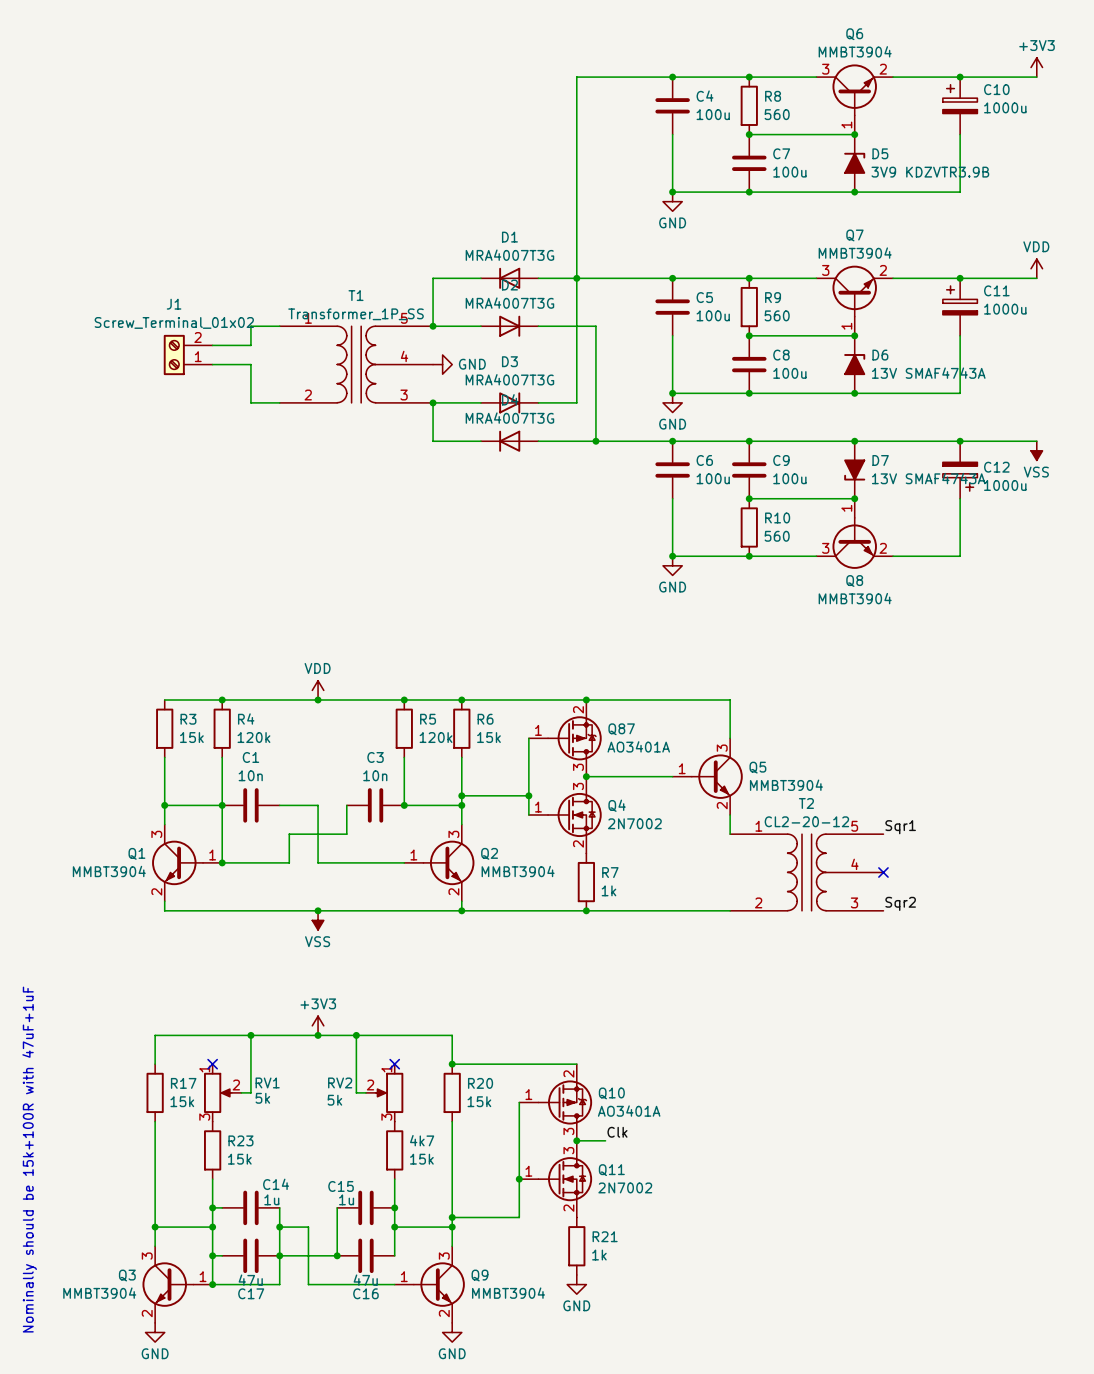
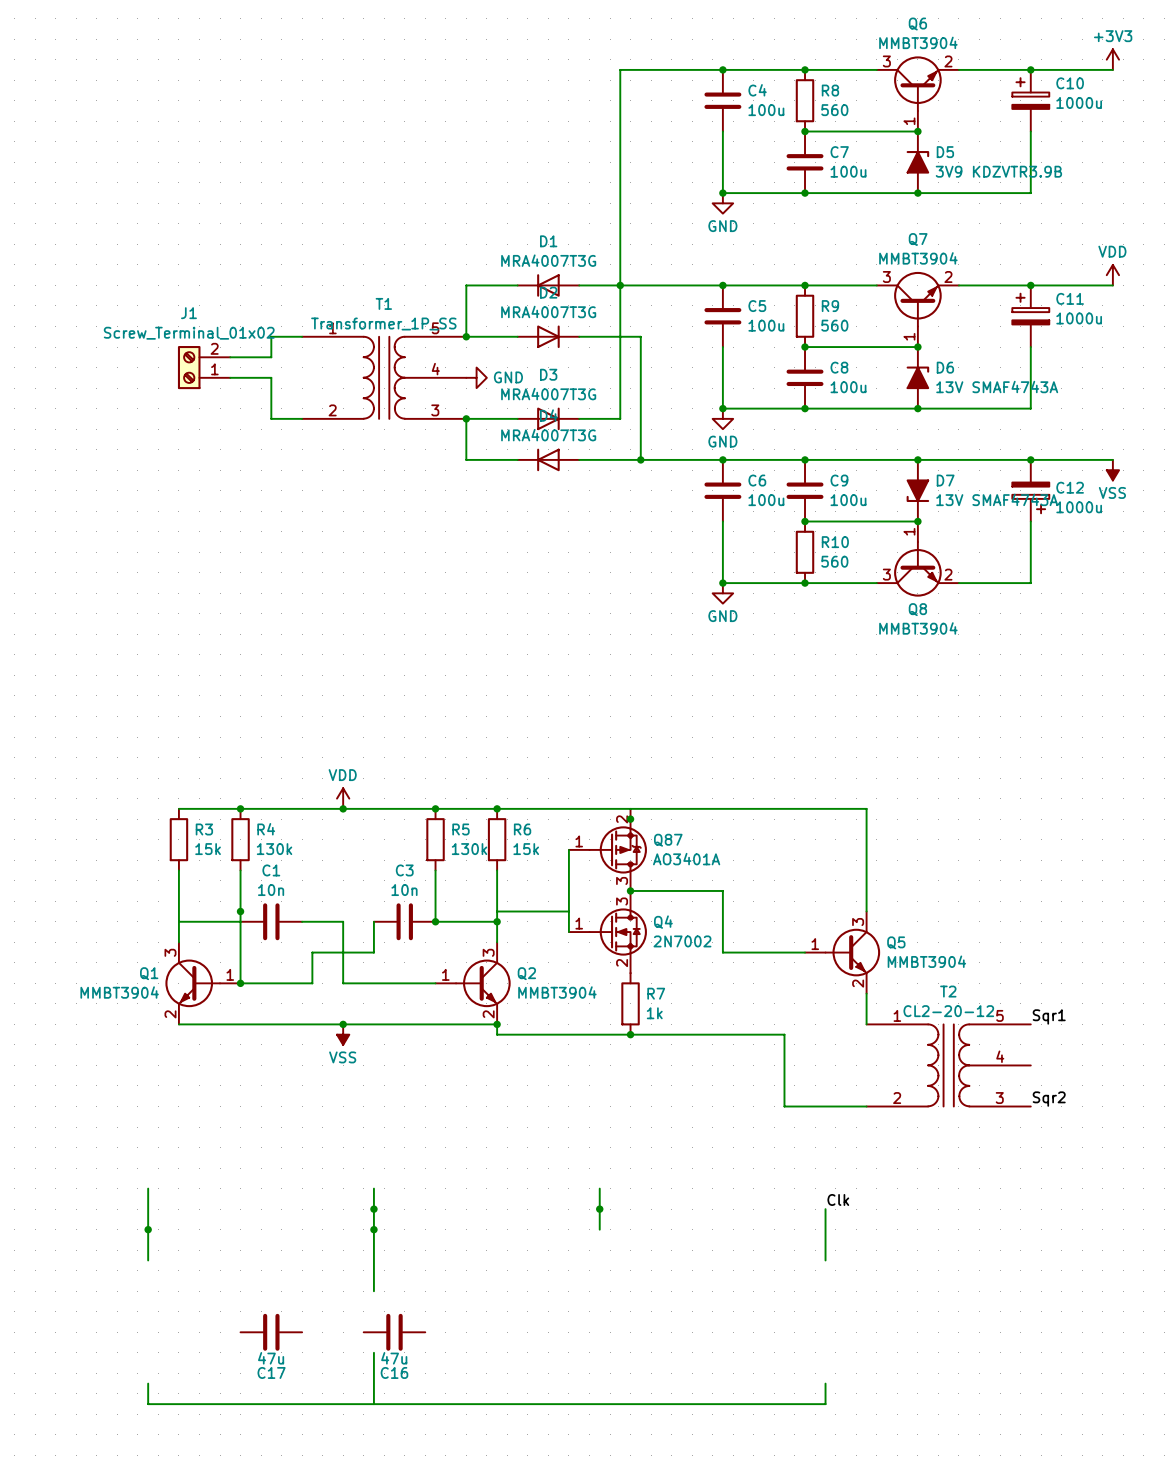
power symbol position: VDD (318, 690) -> VDD (343, 798)
wire: (164, 699) (730, 699) (730, 738) -> none
junction: (222, 699) -> none
junction: (318, 699) -> none
junction: (404, 699) -> none
junction: (461, 699) -> none
junction: (586, 699) -> none
R3 position: (164, 728) -> (178, 839)
R4 position: (222, 728) -> (240, 839)
R5 position: (404, 728) -> (435, 839)
R6 position: (461, 728) -> (497, 839)
R4 value: 120k (253, 737) -> 130k (274, 849)
R5 value: 120k (436, 737) -> 130k (469, 849)
wire: (528, 738) (528, 805) -> (568, 860) (568, 932)
Q87 position: (565, 738) -> (607, 849)
wire: (164, 757) (164, 824) -> (178, 942) (178, 870)
wire: (222, 757) (222, 824) -> none
wire: (404, 757) (404, 805) (461, 805) -> (435, 870) (435, 921) (497, 921)
wire: (461, 757) (461, 824) -> (497, 942) (497, 870)
wire: none -> (178, 808) (866, 808) (866, 911)
junction: none -> (240, 808)
junction: none -> (343, 808)
junction: none -> (435, 808)
junction: none -> (497, 808)
wire: (586, 776) (672, 776) -> none
Q5 position: (707, 776) -> (842, 952)
wire: (461, 795) (528, 795) -> (497, 911) (568, 911)
junction: (461, 795) -> none
junction: (528, 795) -> none
wire: (164, 805) (222, 805) -> (178, 921) (240, 921)
junction: (164, 805) -> none
junction: (222, 805) -> none
C1 position: (250, 805) -> (271, 921)
wire: (279, 805) (318, 805) (318, 862) (404, 862) -> (302, 921) (343, 921) (343, 983) (435, 983)
wire: (346, 805) (346, 834) (289, 834) (289, 862) (222, 862) -> (373, 921) (373, 952) (312, 952) (312, 983) (240, 983) (240, 911)
C3 position: (375, 805) -> (404, 921)
junction: (404, 805) -> none
junction: (461, 805) -> none
Q4 position: (565, 814) -> (607, 932)
wire: (730, 814) (730, 834) -> none
label position: Sqr1 (900, 827) -> Sqr1 (1049, 1016)
wire: none -> (630, 890) (722, 890) (722, 952) (805, 952)
junction: none -> (630, 890)
Q1 position: (187, 862) -> (202, 983)
Q2 position: (439, 862) -> (473, 983)
junction: none -> (435, 921)
junction: none -> (497, 921)
T2 position: (806, 872) -> (948, 1065)
no-connect mark: (883, 872) -> none
R7 position: (586, 882) -> (630, 1003)
wire: (164, 901) (164, 910) (730, 910) -> none
label position: Sqr2 (900, 903) -> Sqr2 (1049, 1099)
junction: (318, 910) -> none
junction: (461, 910) -> none
junction: (586, 910) -> none
power symbol position: VSS (318, 920) -> VSS (343, 1034)
junction: none -> (240, 983)
wire: none -> (866, 993) (866, 1024)
wire: none -> (178, 1024) (497, 1024) (497, 1034) (784, 1034) (784, 1106) (866, 1106)
junction: none -> (343, 1024)
junction: none -> (497, 1024)
junction: none -> (630, 1034)
power symbol: +3V3 (318, 1025) -> none
wire: (250, 1035) (250, 1092) (241, 1092) -> none
junction: (250, 1035) -> none
junction: (318, 1035) -> none
wire: (356, 1035) (356, 1092) (365, 1092) -> none
junction: (356, 1035) -> none
wire: (155, 1064) (155, 1035) (452, 1035) (452, 1064) (576, 1064) -> none
no-connect mark: (212, 1064) -> none
no-connect mark: (394, 1064) -> none
junction: (452, 1064) -> none
R17: 15k (155, 1092) -> none
RV1: 5k (222, 1092) -> none
RV2: 5k (384, 1092) -> none
R20: 15k (452, 1092) -> none
wire: (519, 1102) (519, 1217) (452, 1217) -> none
Q10: AO3401A (555, 1102) -> none
wire: none -> (148, 1188) (148, 1260)
wire: (155, 1121) (155, 1246) -> none
wire: none -> (373, 1188) (373, 1291)
wire: (452, 1121) (452, 1246) -> none
wire: none -> (599, 1188) (599, 1229)
label position: Clk (617, 1132) -> Clk (838, 1199)
junction: none -> (373, 1209)
wire: (576, 1140) (605, 1140) -> none
junction position: (576, 1140) -> (599, 1209)
wire: none -> (825, 1209) (825, 1260)
R23: 15k (212, 1150) -> none
4k7: 15k (394, 1150) -> none
text: Nominally should be 15k+100R with 47uF+1uF (29, 1159) -> none
junction: none -> (148, 1229)
junction: none -> (373, 1229)
wire: (212, 1179) (212, 1284) (279, 1284) (279, 1207) -> none
wire: (394, 1179) (394, 1255) -> none
junction: (519, 1179) -> none
Q11: 2N7002 (555, 1179) -> none
wire: (212, 1207) (222, 1207) -> none
junction: (212, 1207) -> none
C14: 1u (250, 1207) -> none
wire: (337, 1207) (337, 1255) (279, 1255) -> none
C15: 1u (365, 1207) -> none
junction: (394, 1207) -> none
junction: (452, 1217) -> none
wire: (155, 1227) (212, 1227) -> none
junction: (155, 1227) -> none
junction: (212, 1227) -> none
wire: (279, 1227) (308, 1227) (308, 1284) (394, 1284) -> none
junction: (279, 1227) -> none
wire: (394, 1227) (452, 1227) -> none
junction: (394, 1227) -> none
junction: (452, 1227) -> none
R21: 1k (576, 1246) -> none
wire: (212, 1255) (222, 1255) -> none
junction: (212, 1255) -> none
junction: (279, 1255) -> none
junction: (337, 1255) -> none
wire: none -> (373, 1352) (373, 1404)
Q3: MMBT3904 (177, 1284) -> none
junction: (212, 1284) -> none
Q9: MMBT3904 (429, 1284) -> none
power symbol: GND (576, 1284) -> none
wire: none -> (148, 1383) (148, 1404) (825, 1404) (825, 1383)
power symbol: GND (155, 1332) -> none
power symbol: GND (452, 1332) -> none

